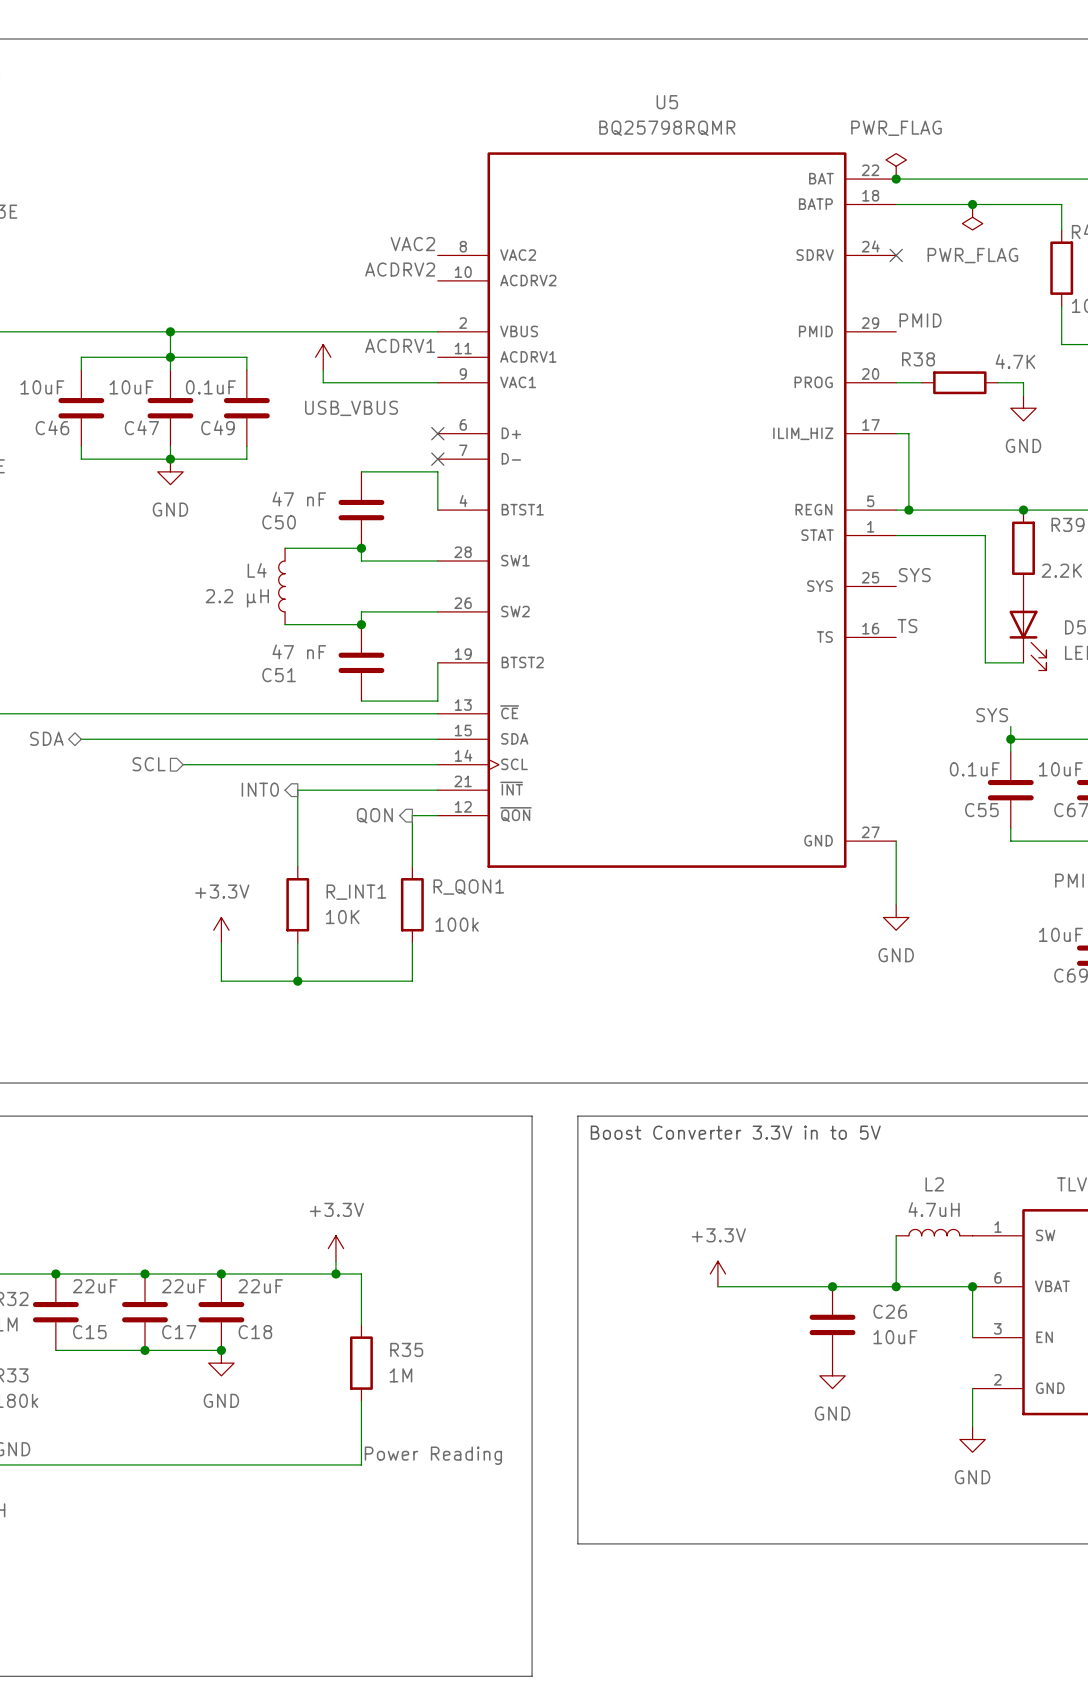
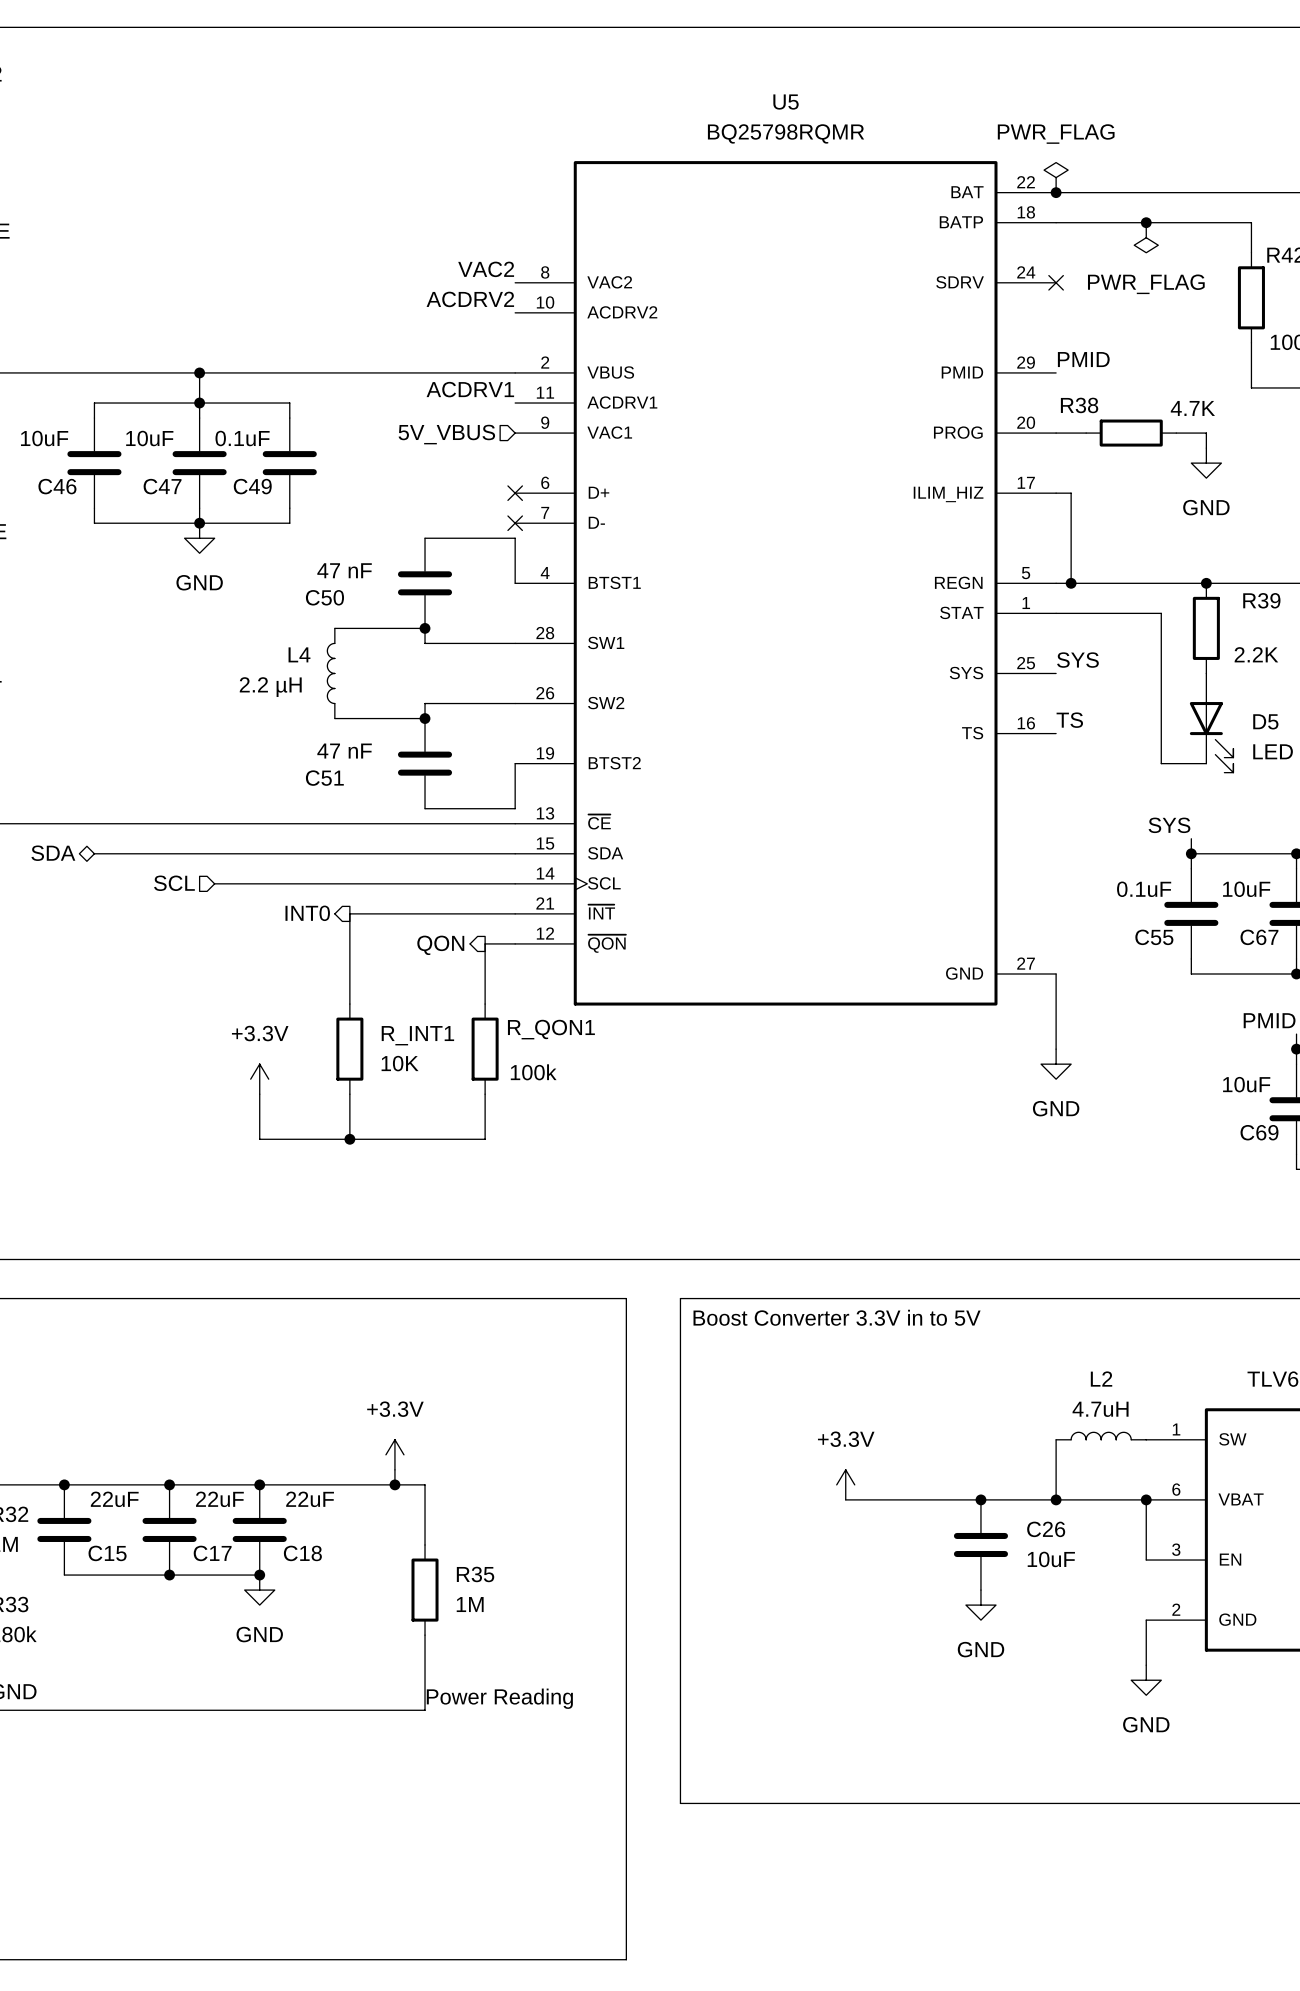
power symbol: USB_VBUS (323, 357) -> none
wire: (323, 370) (323, 382) (437, 382) -> none
hierarchical label: none -> 5V_VBUS (446, 434)

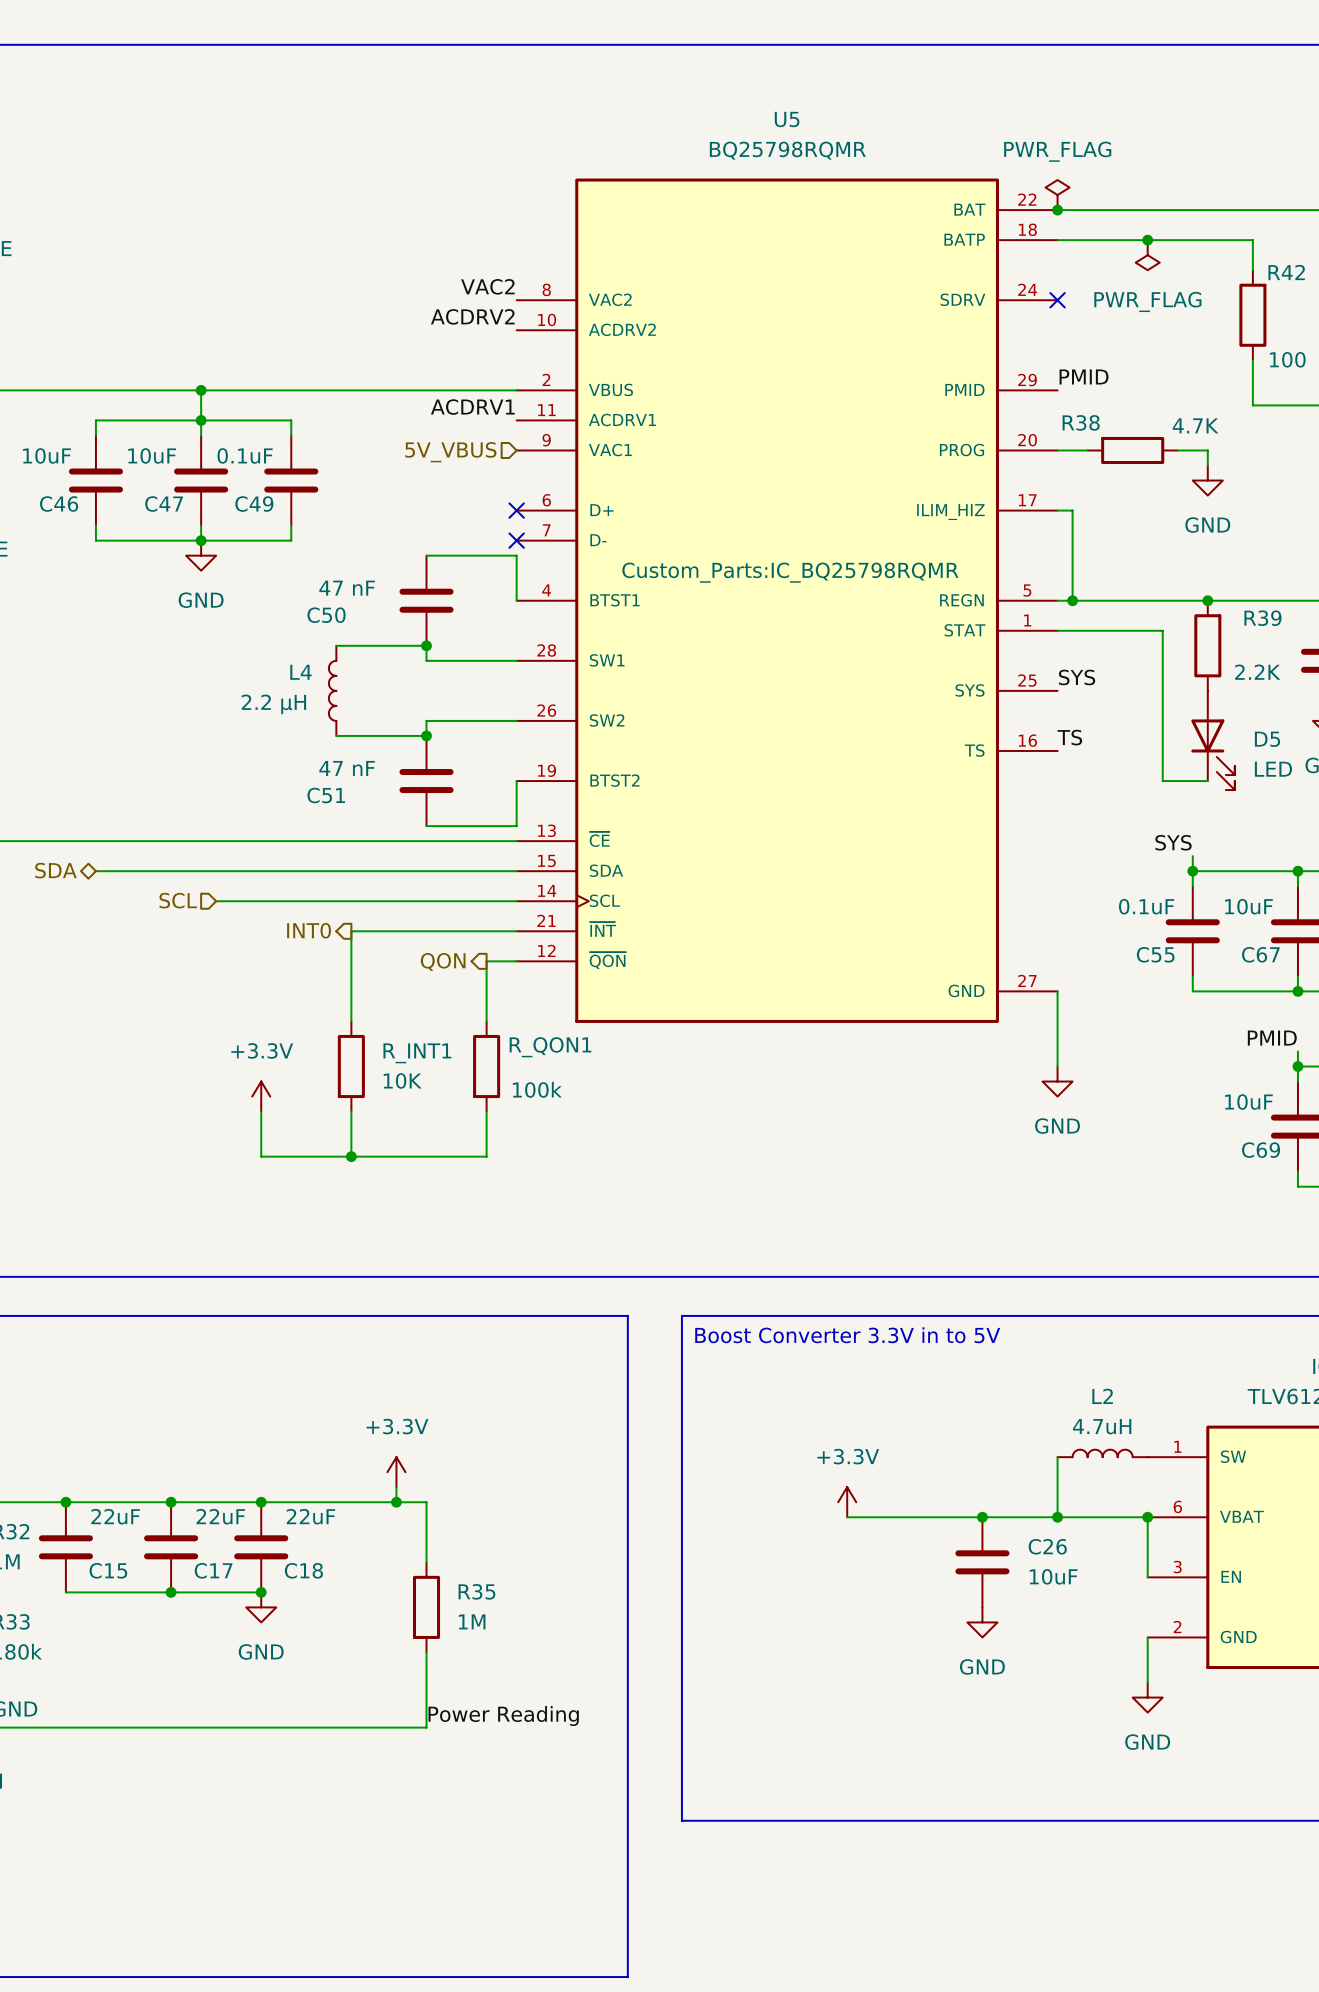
U5 text: none -> Custom_Parts:IC_BQ25798RQMR (790, 572)

